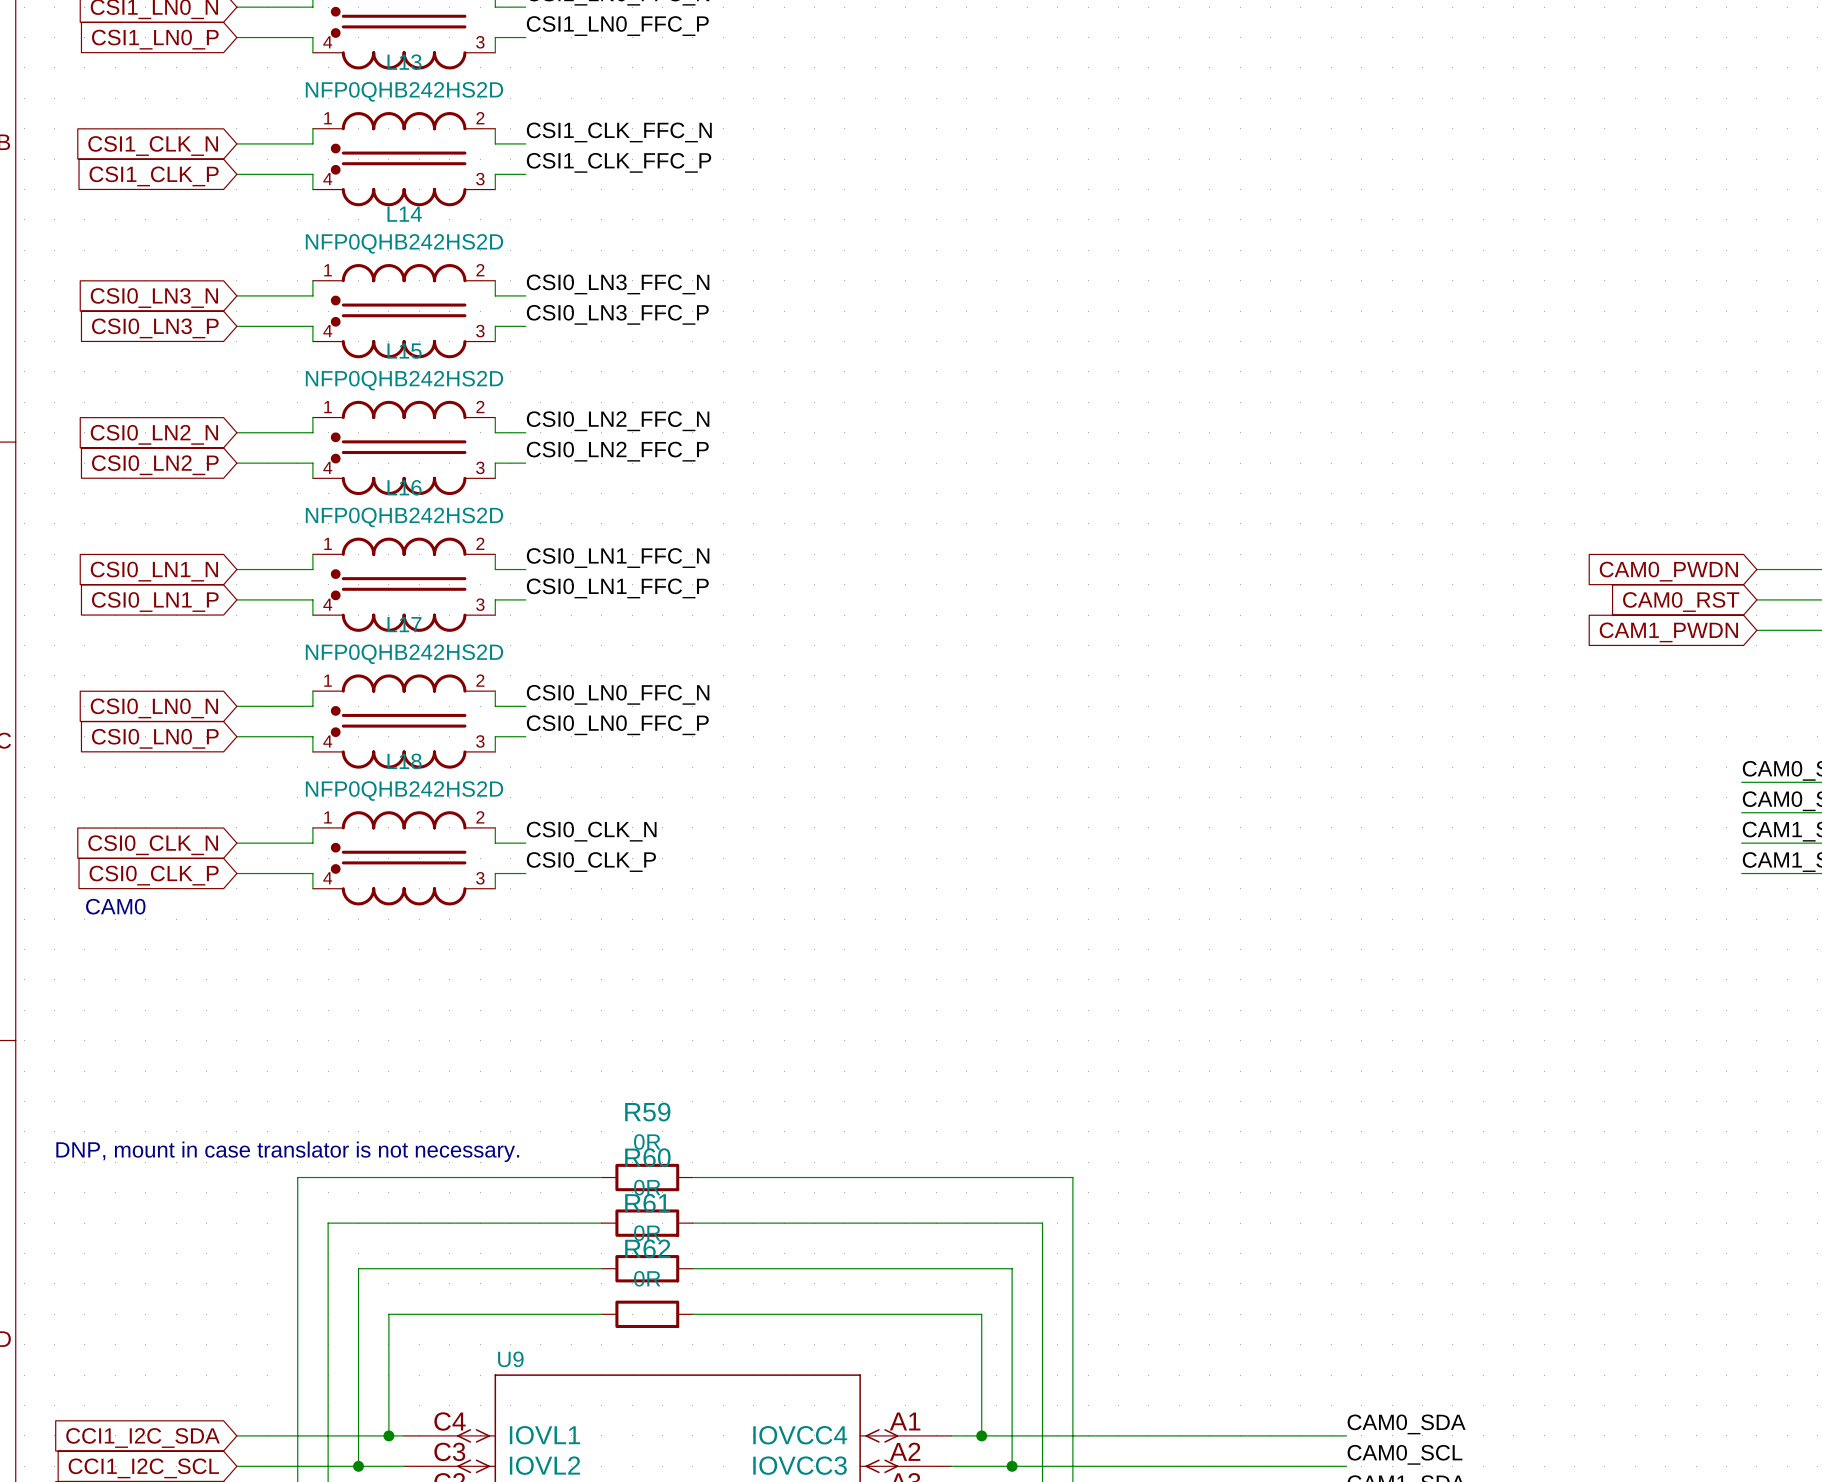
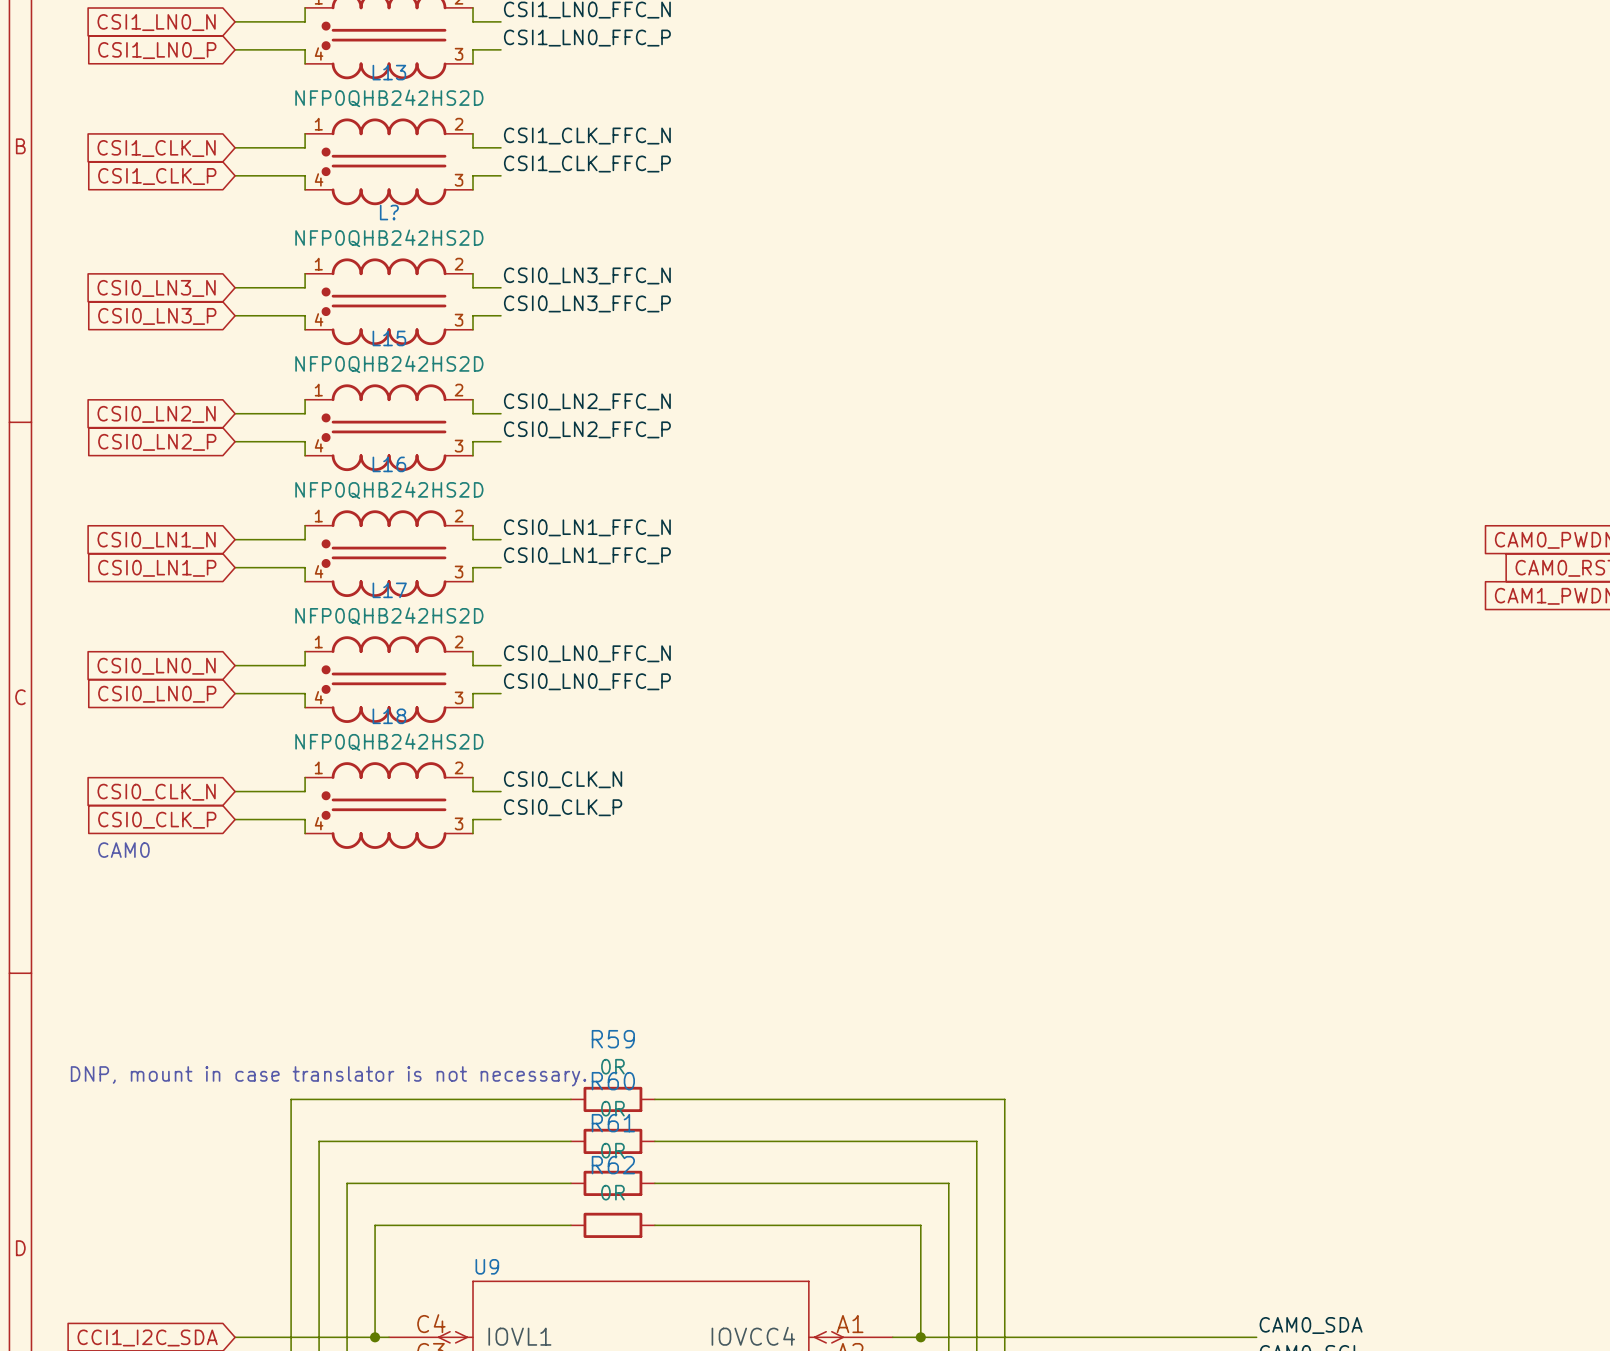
L14 name: L14 (404, 214) -> L? (389, 212)

